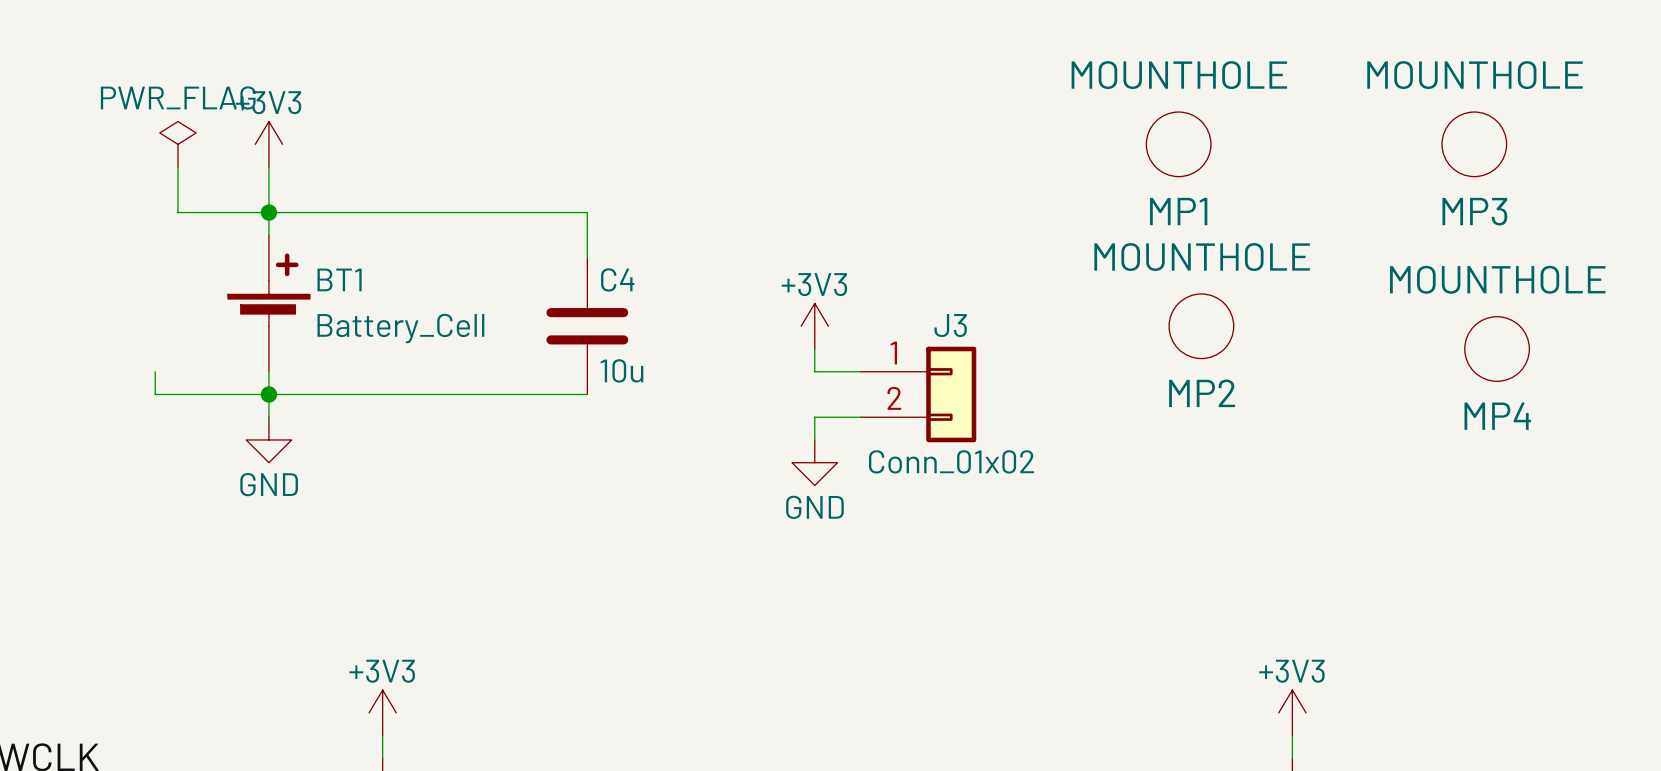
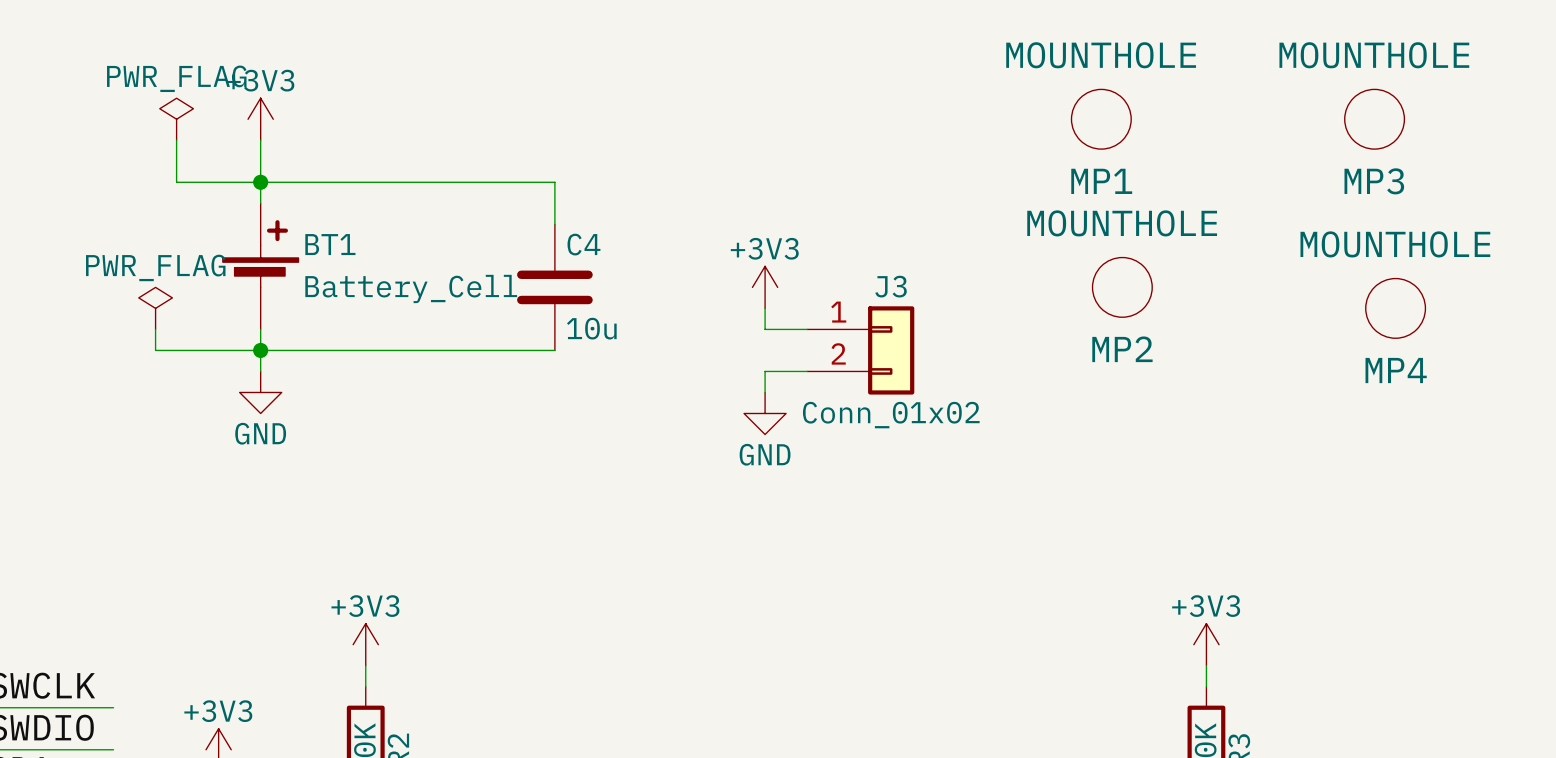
power symbol: none -> PWR_FLAG (155, 308)

